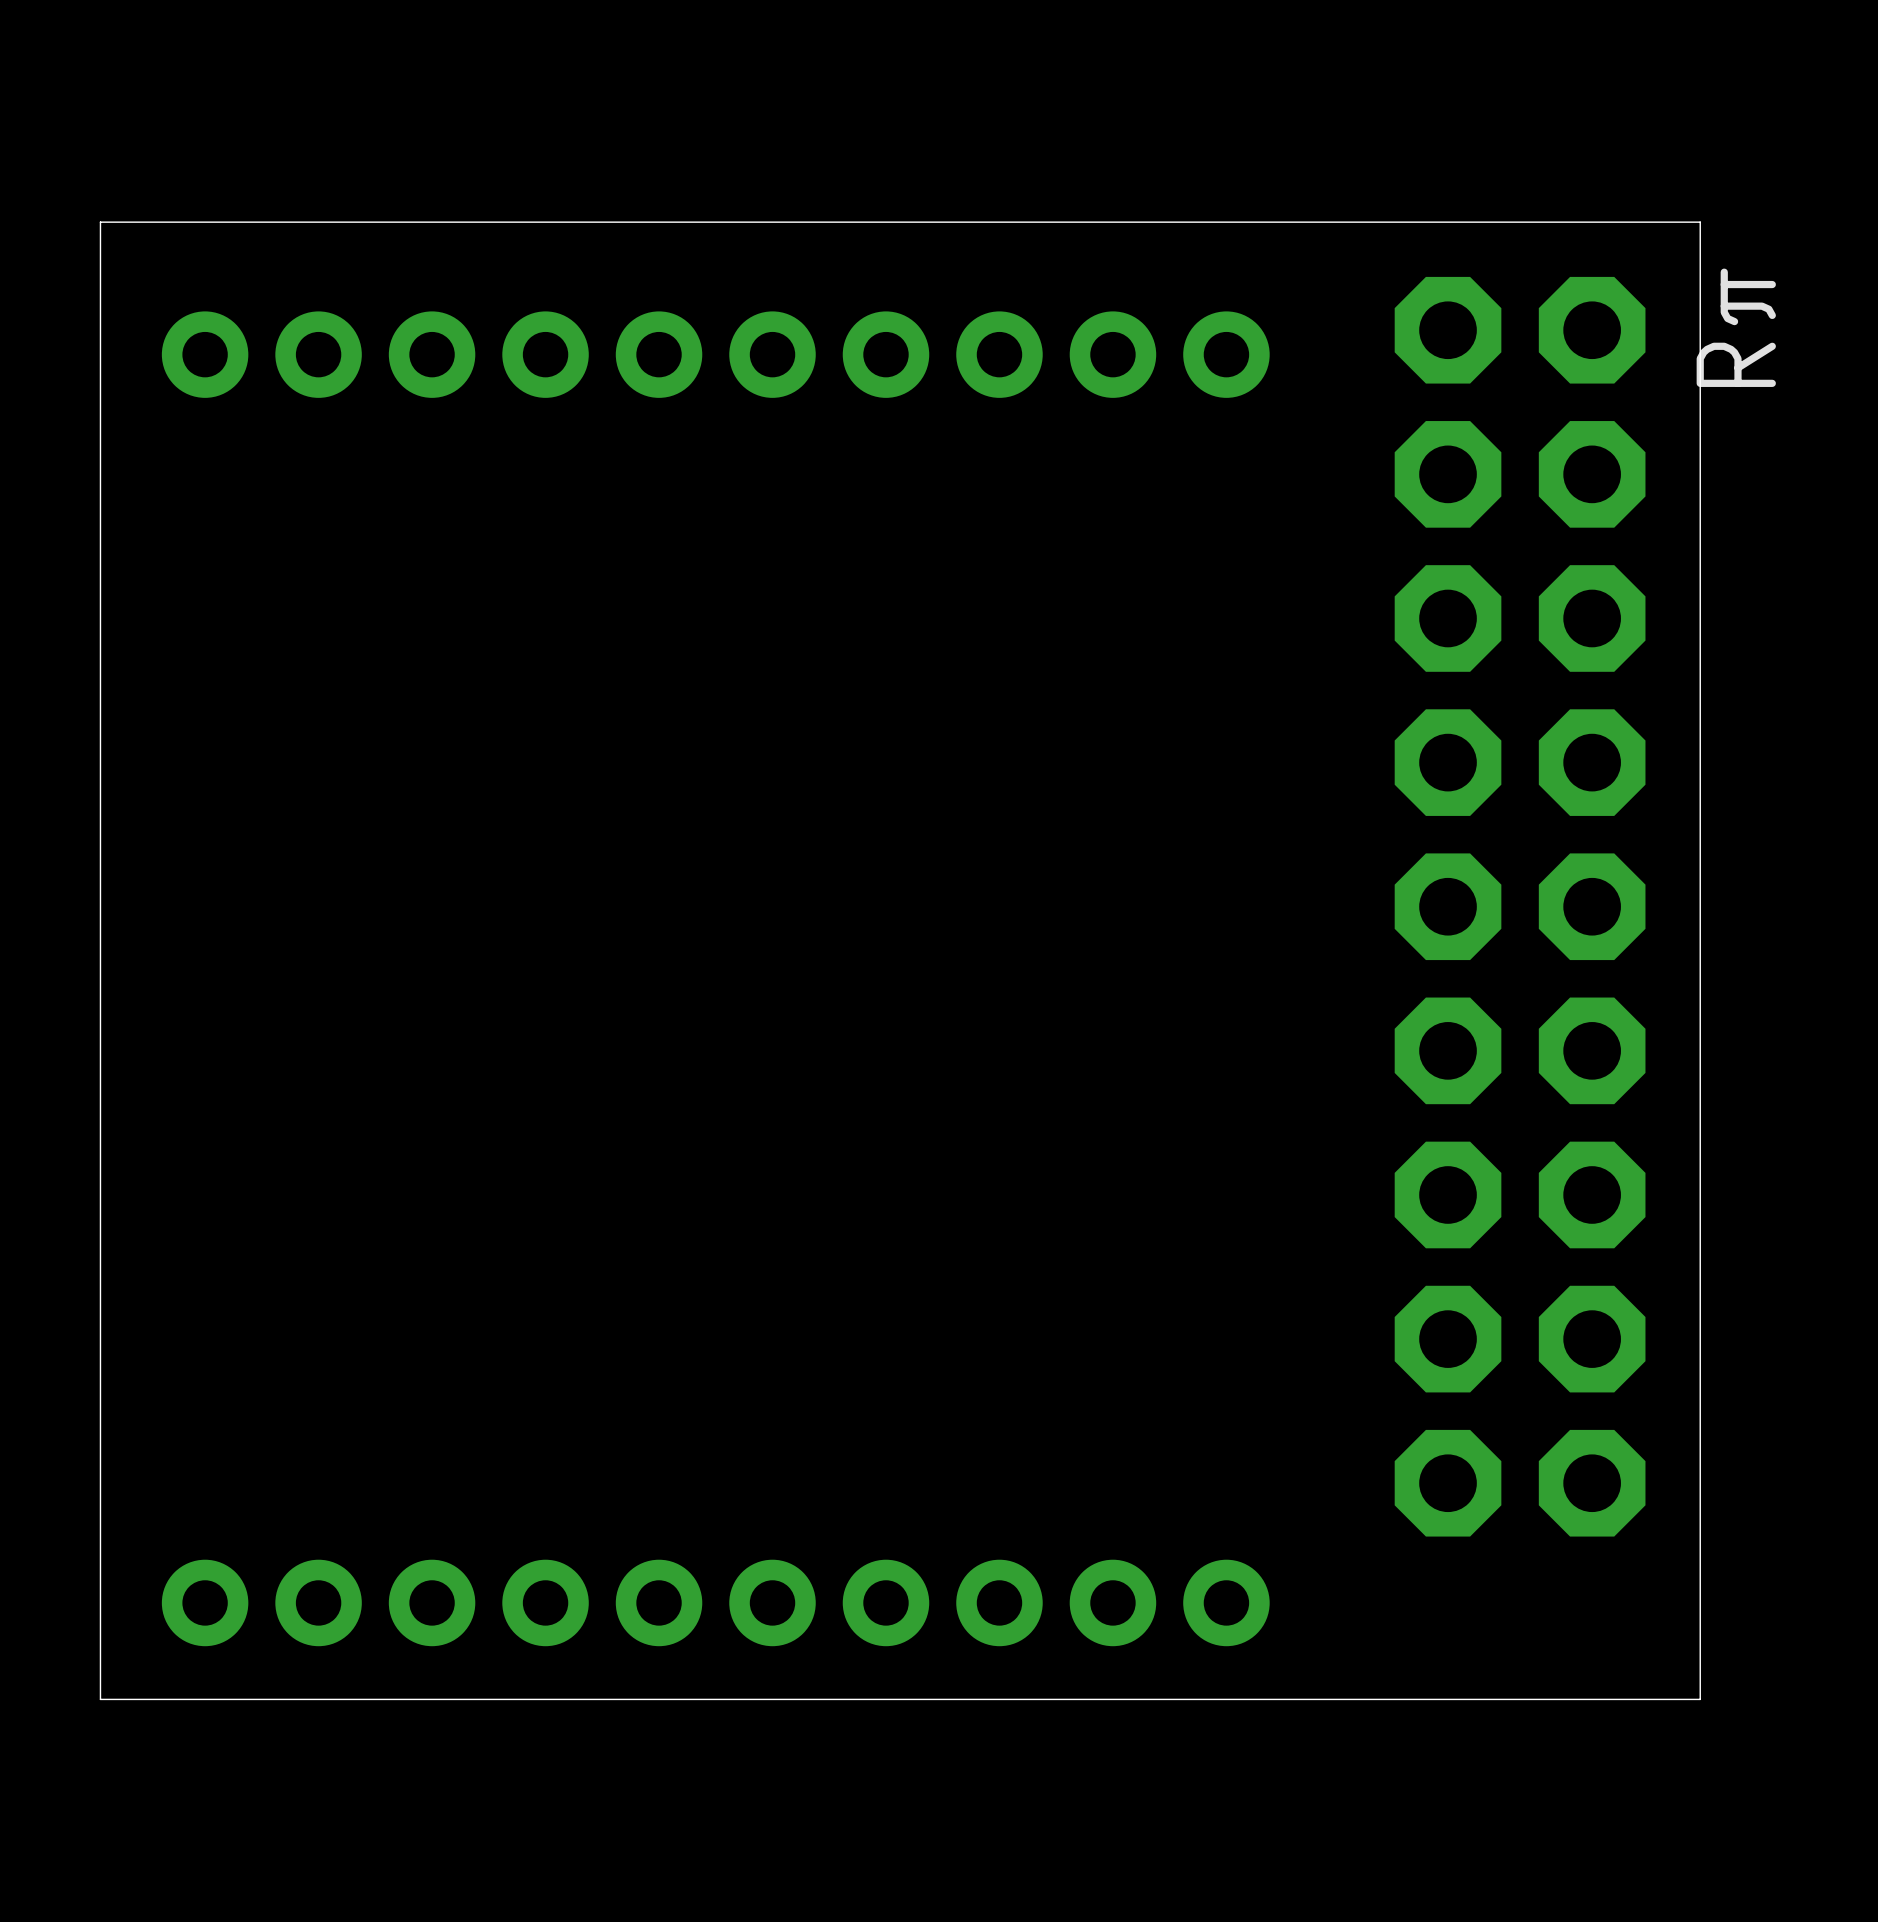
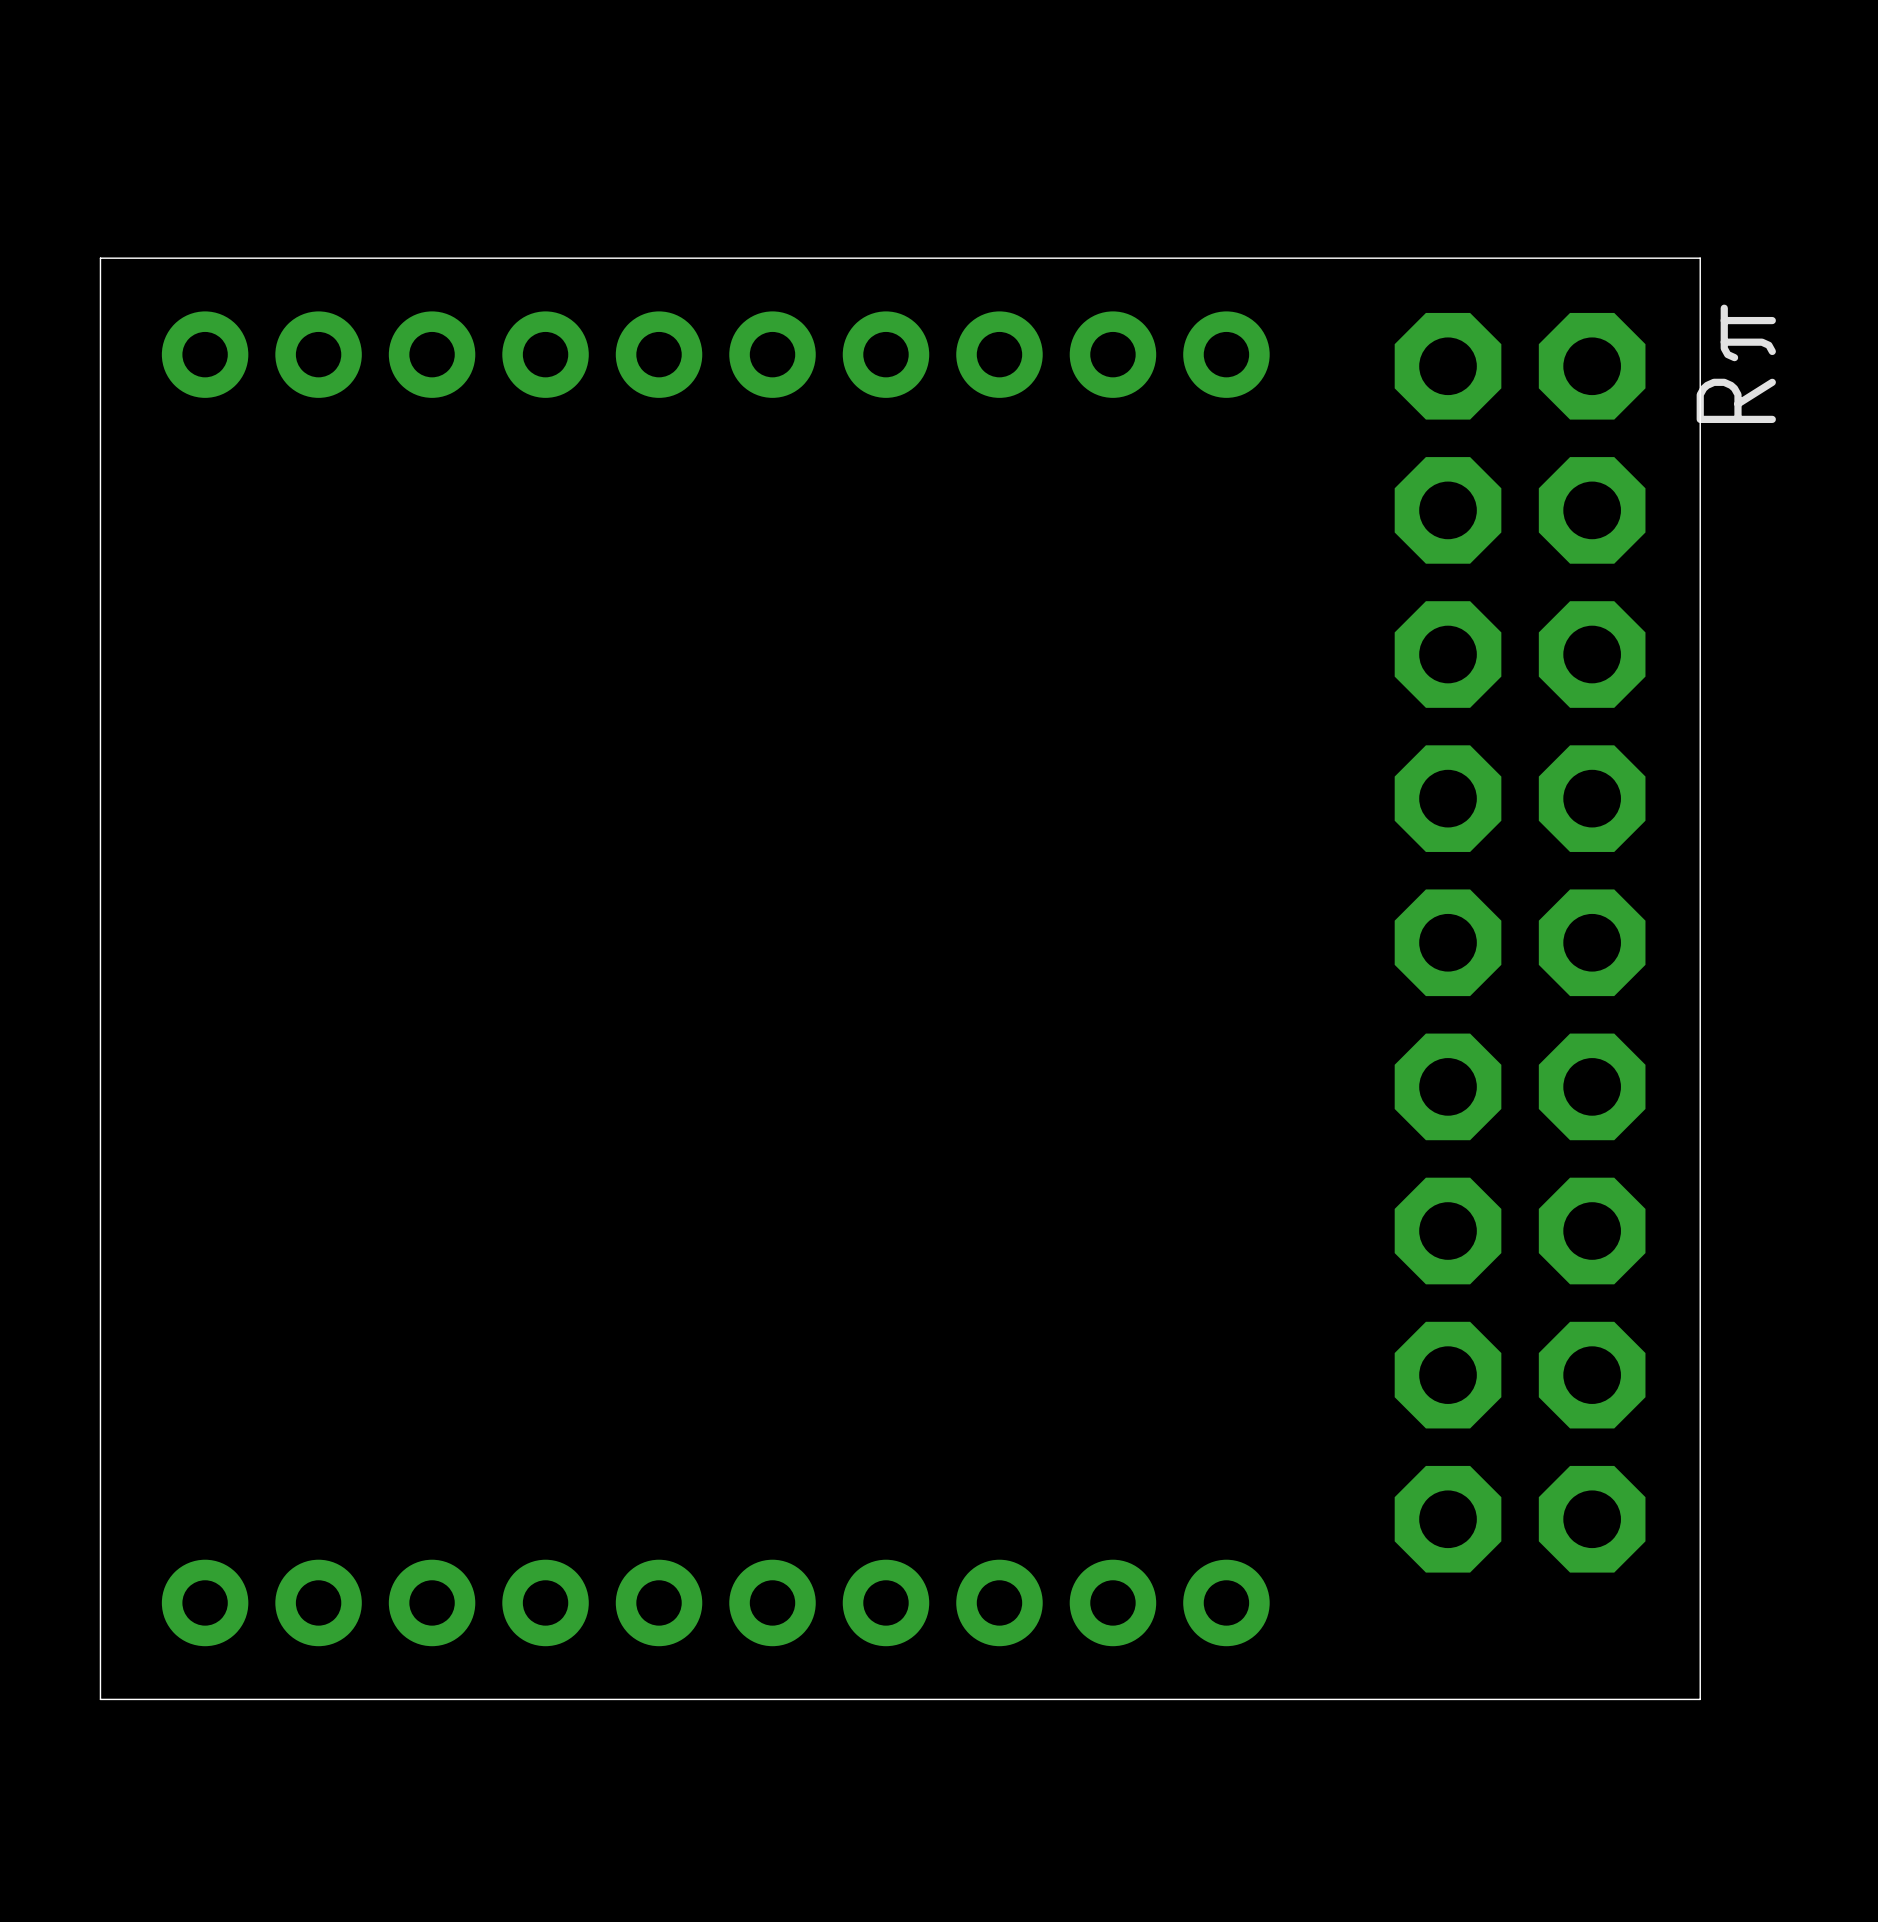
board edge: (1700, 258) (1700, 222) (100, 222) (100, 258) -> (1700, 258) (100, 258)
Rπ position: (1520, 906) -> (1520, 942)

